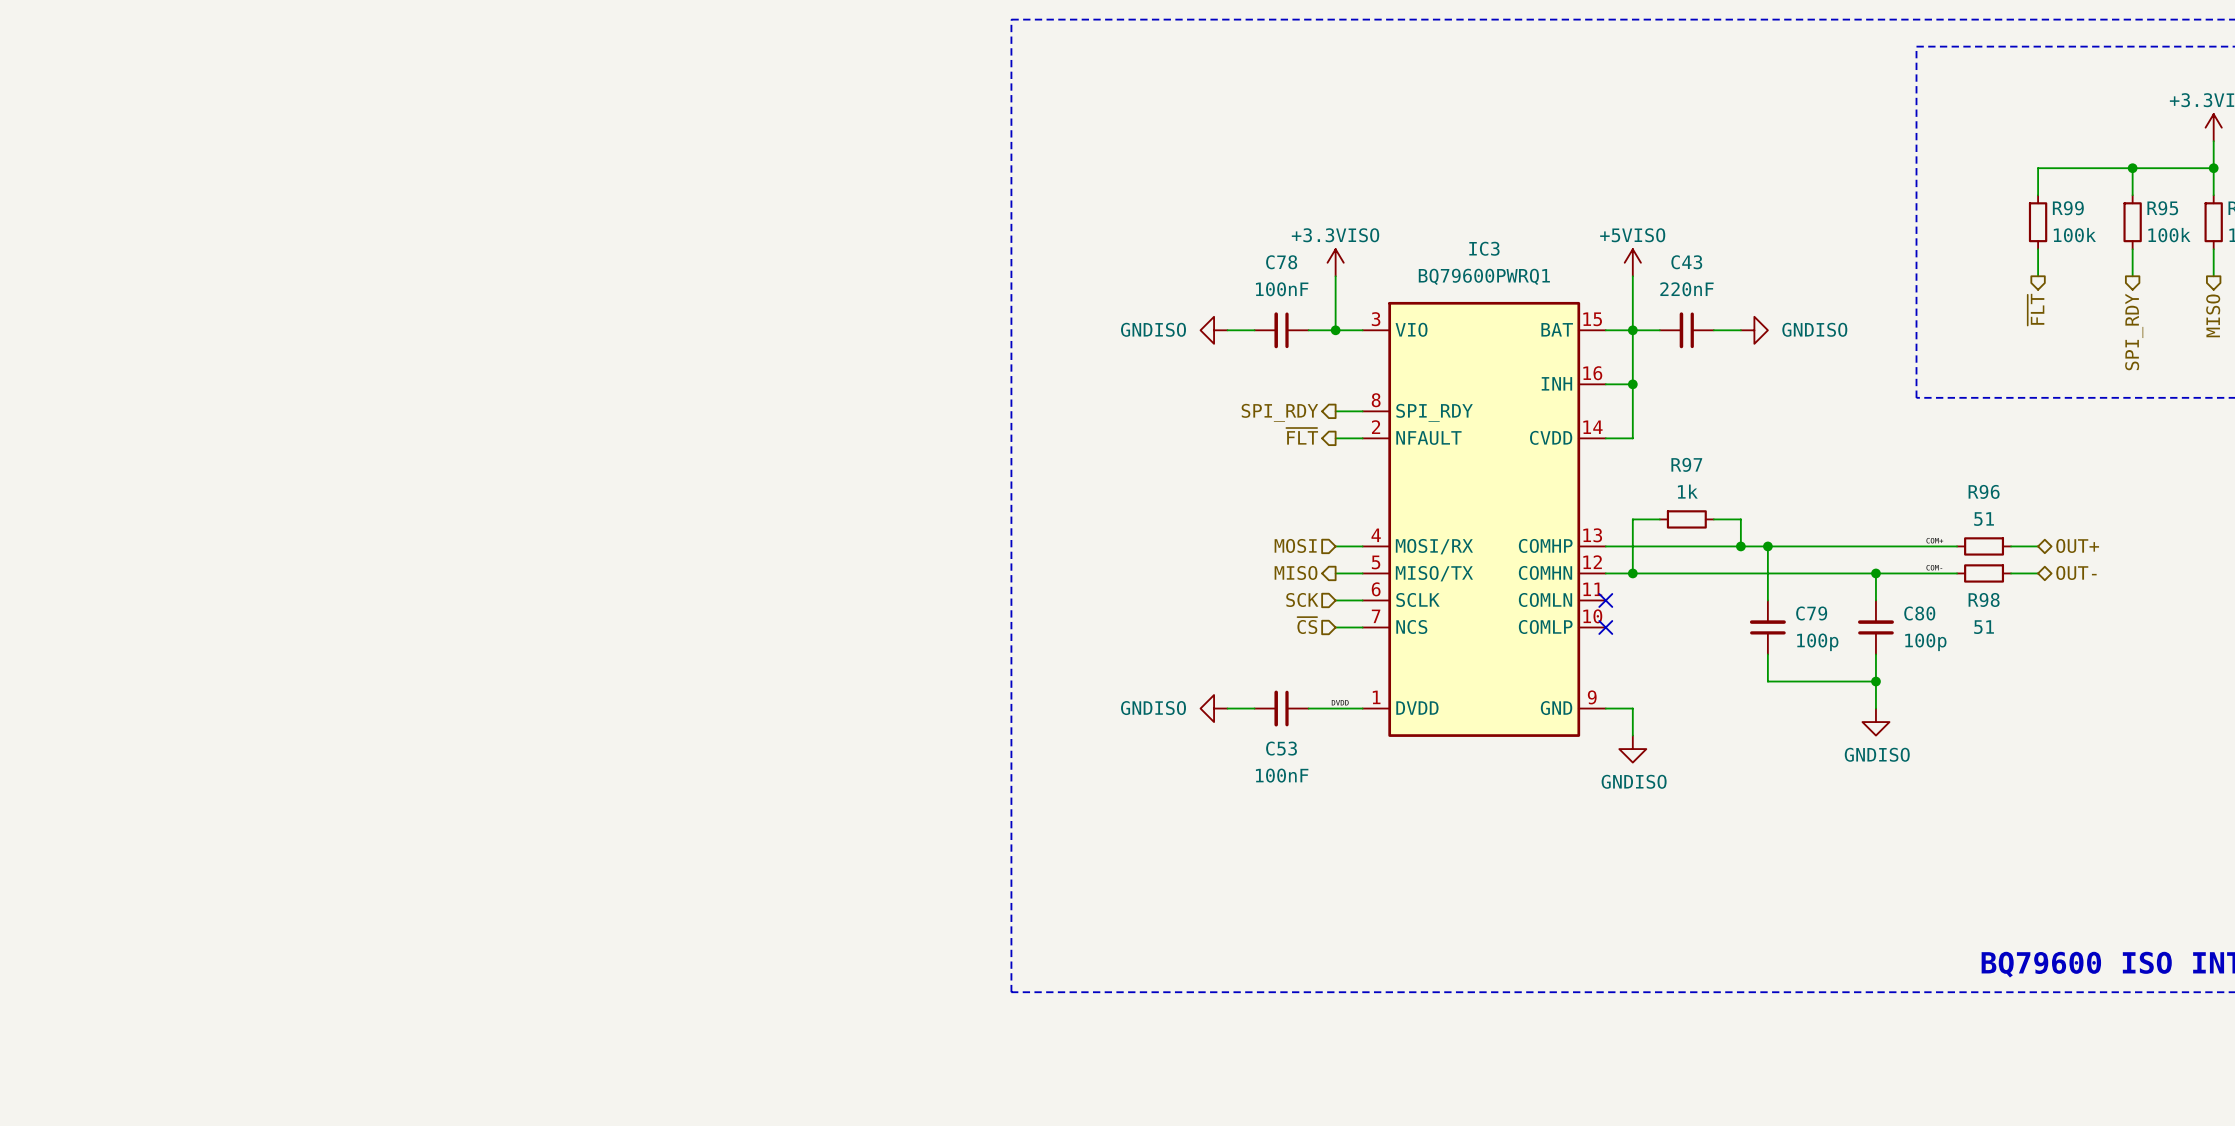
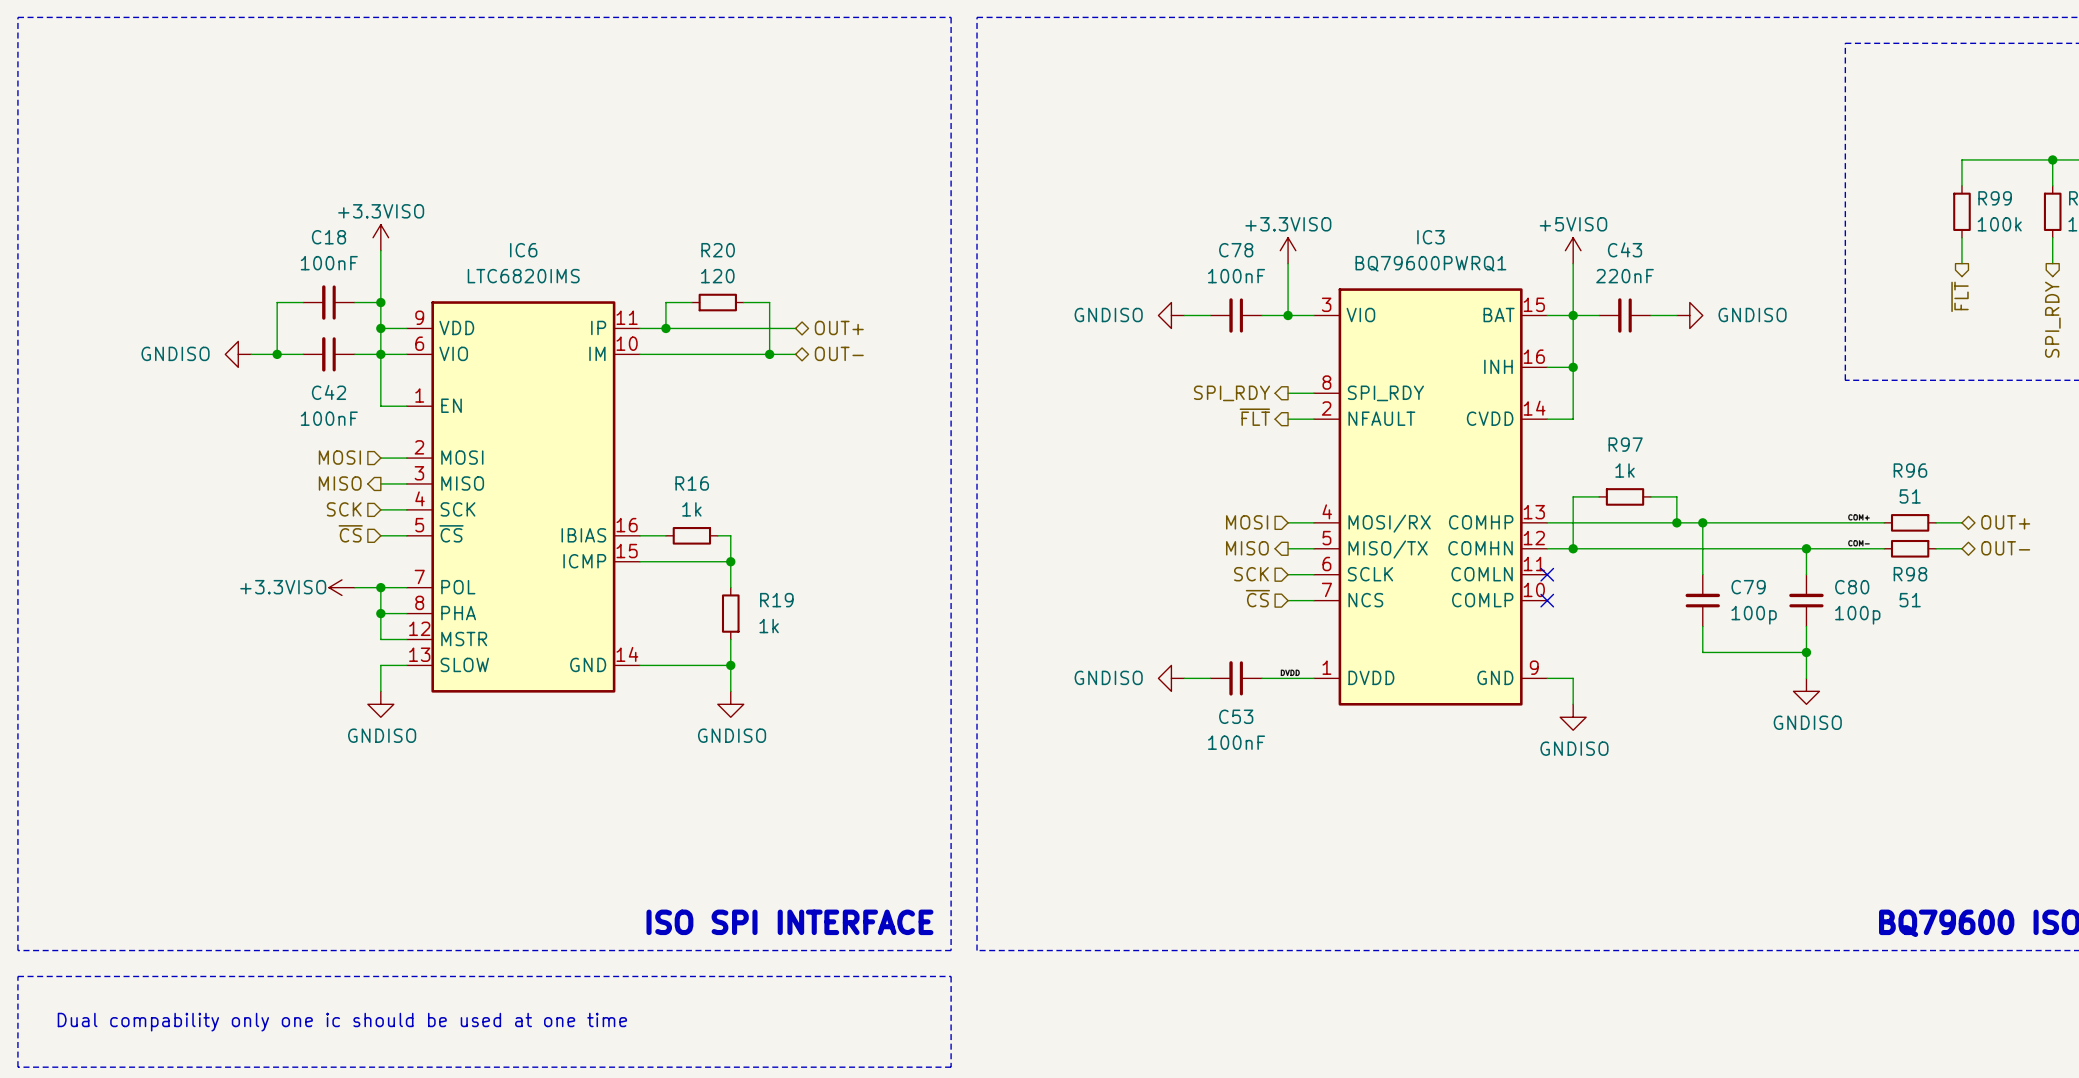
line: none -> (17, 17) (17, 950) (951, 950) (951, 17) (17, 17)
power symbol: none -> +3.3VISO (380, 237)
wire: none -> (380, 250) (380, 406) (406, 406)
wire: none -> (303, 302) (277, 302) (277, 354)
C18: none -> 100nF (328, 302)
wire: none -> (354, 302) (380, 302)
junction: none -> (380, 302)
wire: none -> (691, 302) (665, 302) (665, 328)
R20: none -> 120 (717, 302)
wire: none -> (743, 302) (769, 302) (769, 354)
wire: none -> (380, 328) (406, 328)
junction: none -> (380, 328)
wire: none -> (640, 328) (795, 328)
junction: none -> (665, 328)
hierarchical label: none -> OUT+ (839, 327)
power symbol: none -> GNDISO (238, 354)
wire: none -> (251, 354) (303, 354)
junction: none -> (277, 354)
C42: none -> 100nF (328, 354)
wire: none -> (354, 354) (406, 354)
junction: none -> (380, 354)
wire: none -> (640, 354) (795, 354)
junction: none -> (769, 354)
hierarchical label: none -> OUT- (839, 353)
hierarchical label: none -> MOSI (339, 457)
wire: none -> (380, 458) (406, 458)
hierarchical label: none -> MISO (340, 483)
wire: none -> (380, 483) (406, 483)
IC6: none -> LTC6820IMS (523, 496)
hierarchical label: none -> SCK (344, 509)
wire: none -> (380, 509) (406, 509)
hierarchical label: none -> ~{CS} (350, 533)
wire: none -> (380, 535) (406, 535)
wire: none -> (640, 535) (665, 535)
R16: none -> 1k (691, 535)
wire: none -> (717, 535) (730, 535) (730, 587)
wire: none -> (640, 561) (730, 561)
junction: none -> (730, 561)
power symbol: none -> +3.3VISO (341, 587)
wire: none -> (354, 587) (406, 587)
wire: none -> (380, 587) (380, 639) (406, 639)
junction: none -> (380, 587)
wire: none -> (380, 613) (406, 613)
junction: none -> (380, 613)
R19: none -> 1k (730, 613)
wire: none -> (730, 639) (730, 691)
wire: none -> (406, 665) (380, 665) (380, 691)
wire: none -> (640, 665) (730, 665)
junction: none -> (730, 665)
power symbol: none -> GNDISO (380, 704)
power symbol: none -> GNDISO (730, 704)
text: none -> ISO SPI INTERFACE (789, 922)
line: none -> (17, 976) (951, 976) (951, 1067) (17, 1067) (17, 976)
text: none -> Dual compability only one ic should be used at one time (342, 1022)

